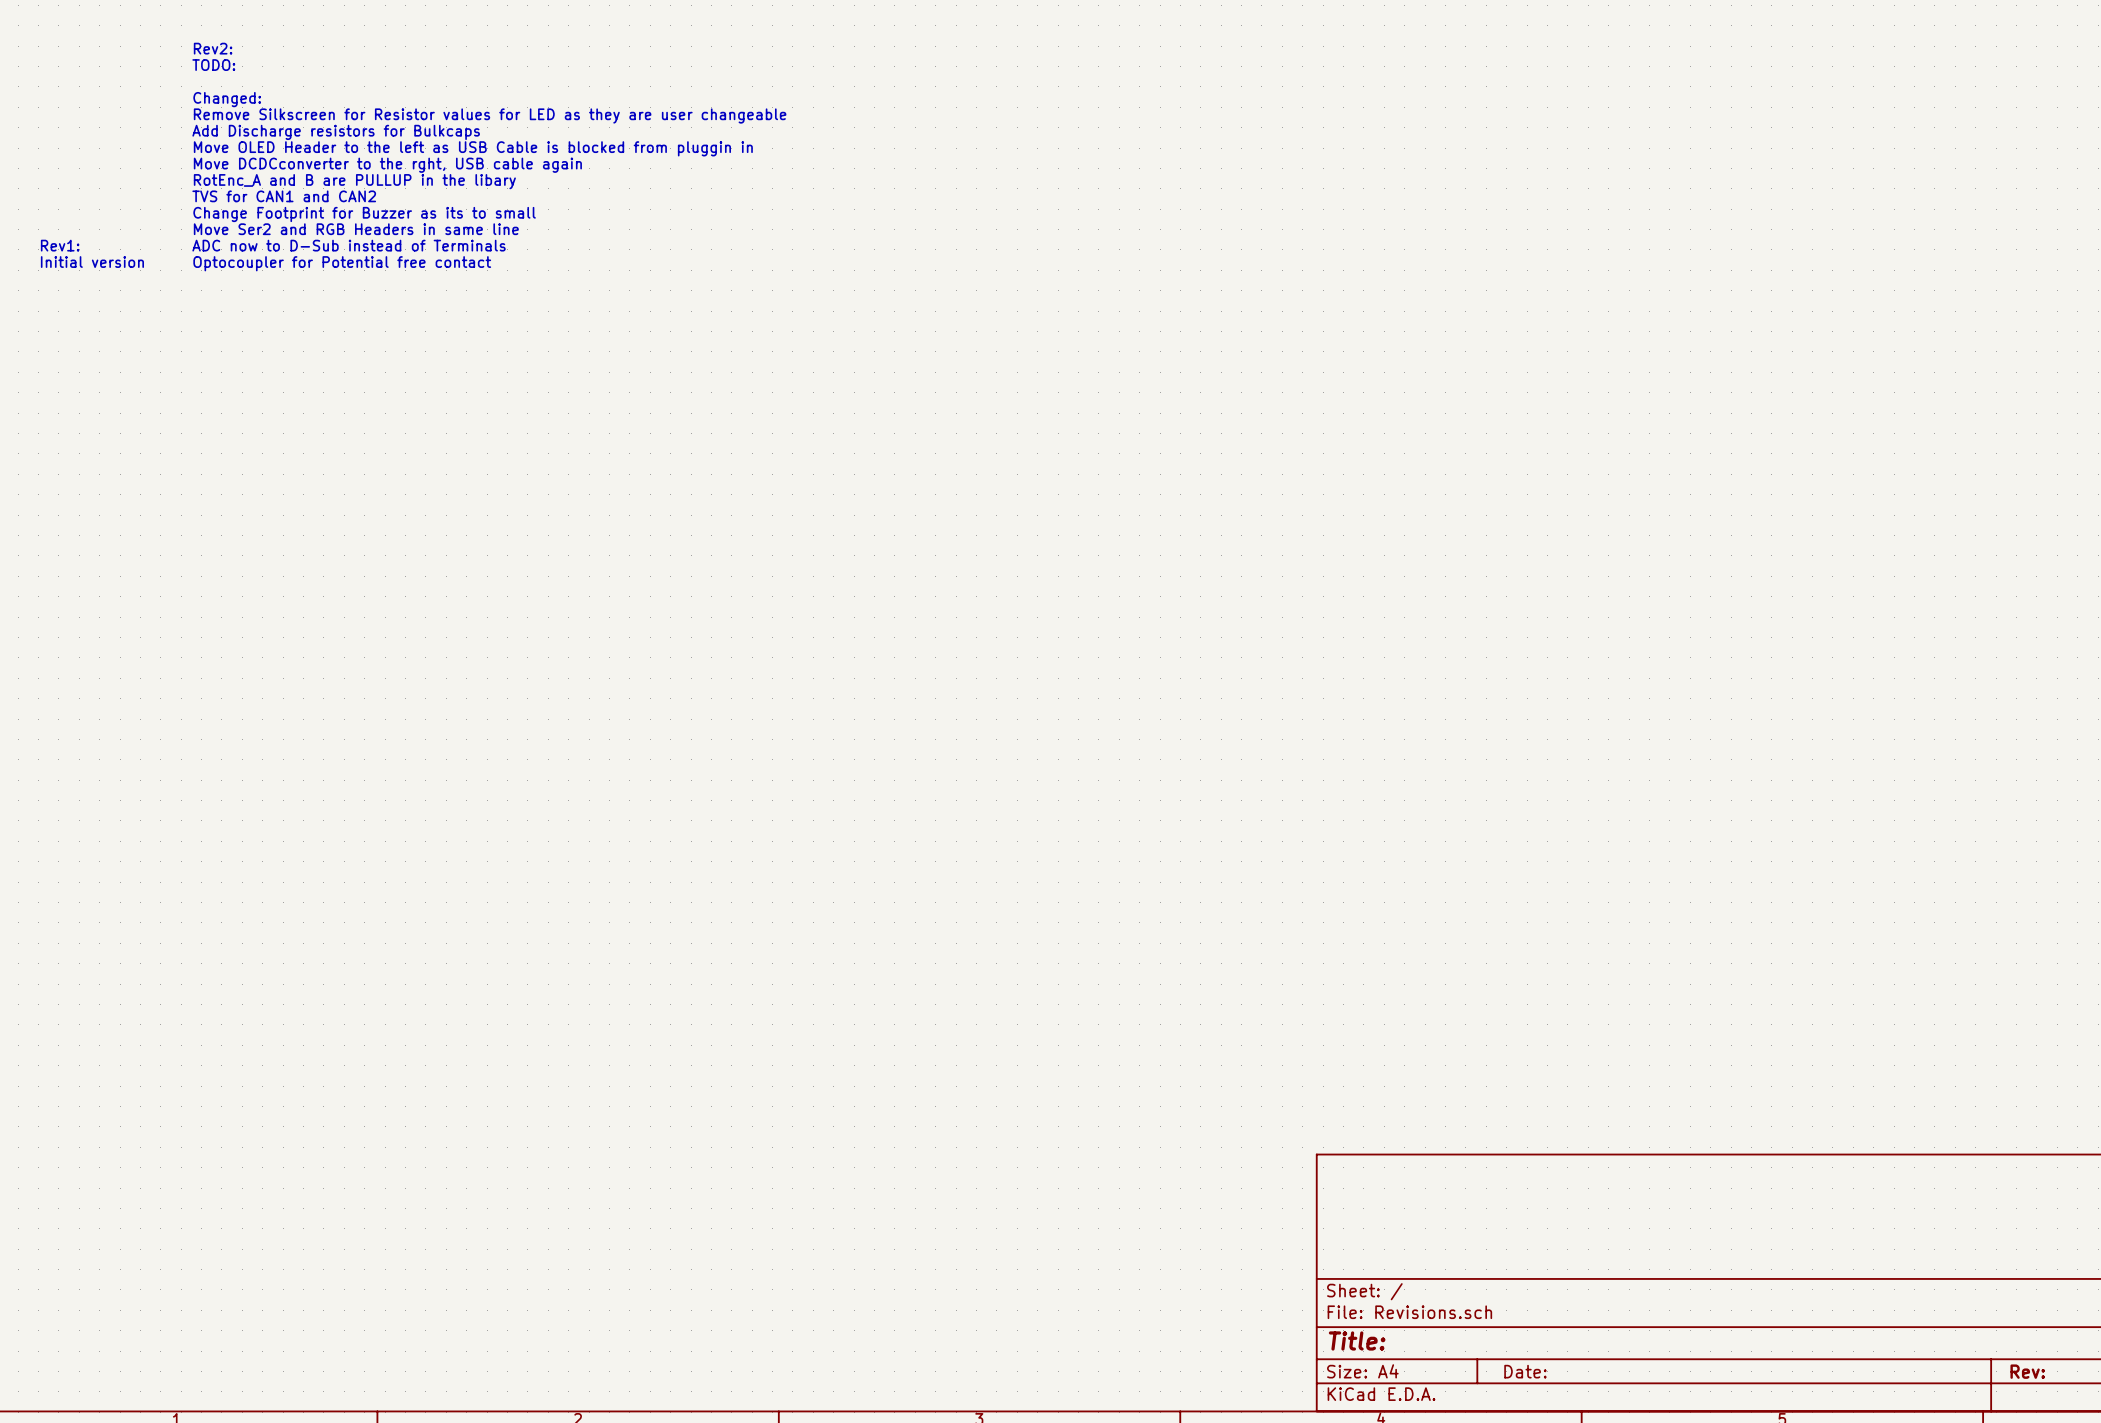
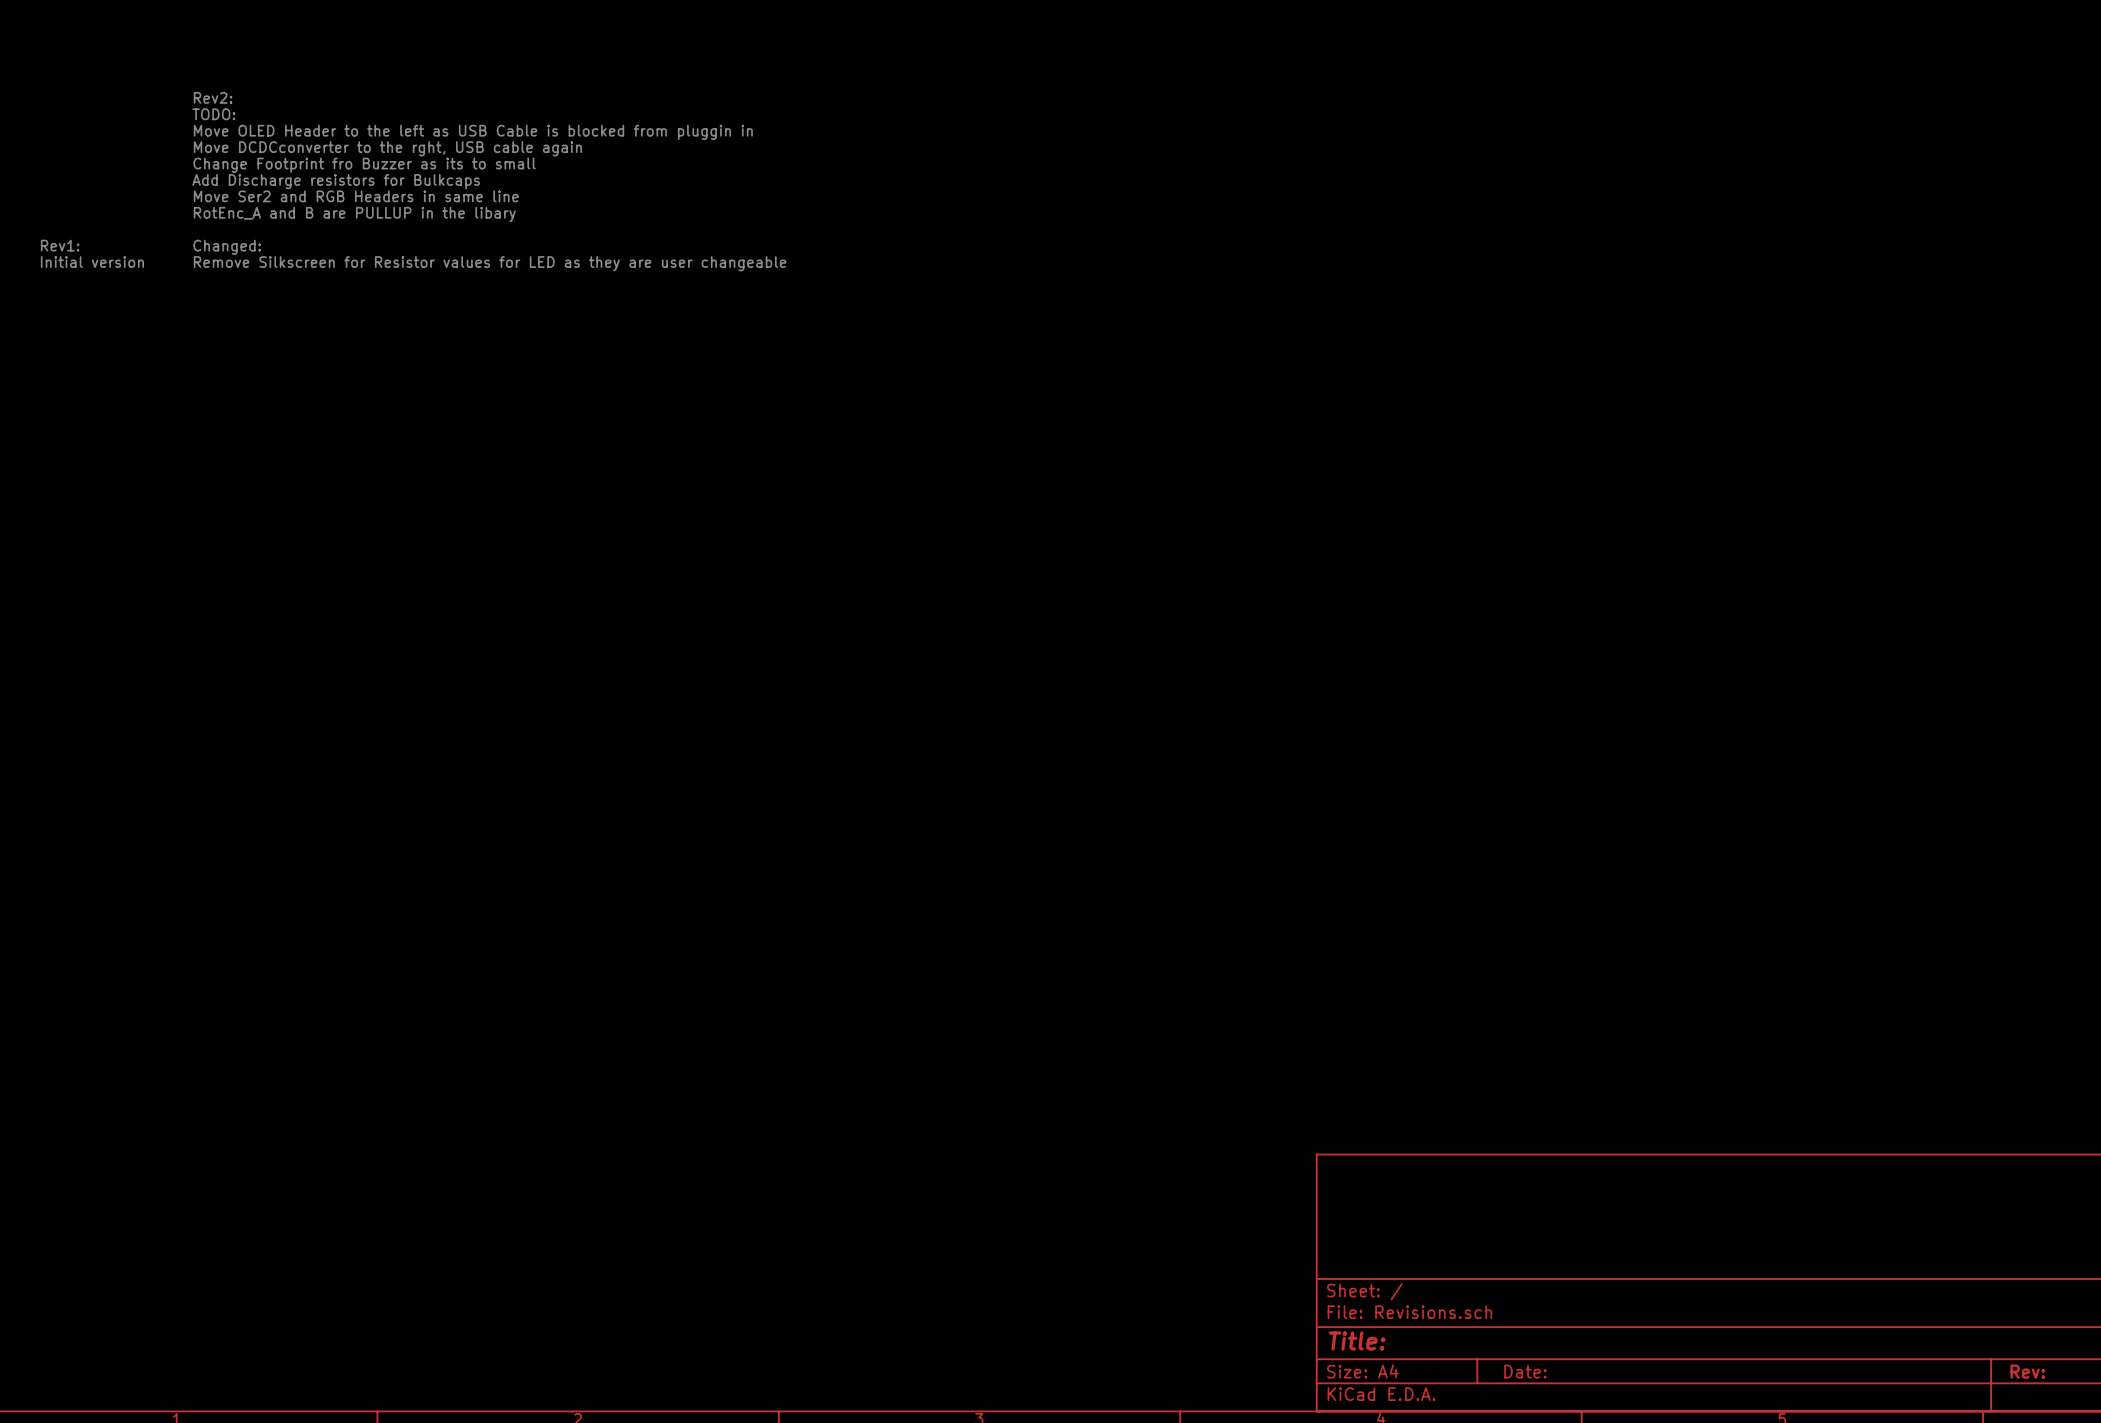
text: Rev2: (213, 48) -> none
text: TODO: (213, 65) -> none
text: Changed: (227, 99) -> Rev2: (213, 97)
text: Remove Silkscreen for Resistor values for LED as they are user changeable (490, 115) -> TODO: (213, 114)
text: Add Discharge resistors for Bulkcaps (336, 132) -> Move OLED Header to the left as USB Cable is blocked from pluggin in (473, 132)
text: Move OLED Header to the left as USB Cable is blocked from pluggin in (473, 148) -> Move DCDCconverter to the rght, USB cable again (387, 148)
text: Move DCDCconverter to the rght, USB cable again (387, 165) -> Change Footprint fro Buzzer as its to small (364, 165)
text: RotEnc_A and B are PULLUP in the libary (354, 181) -> Add Discharge resistors for Bulkcaps (336, 181)
text: TVS for CAN1 and CAN2 (284, 196) -> Move Ser2 and RGB Headers in same line (356, 196)
text: Change Footprint for Buzzer as its to small (364, 214) -> RotEnc_A and B are PULLUP in the libary (354, 214)
text: Move Ser2 and RGB Headers in same line (356, 229) -> none
text: ADC now to D-Sub instead of Terminals (349, 245) -> Changed: (227, 247)
text: Optocoupler for Potential free contact (342, 263) -> Remove Silkscreen for Resistor values for LED as they are user changeable (490, 263)

